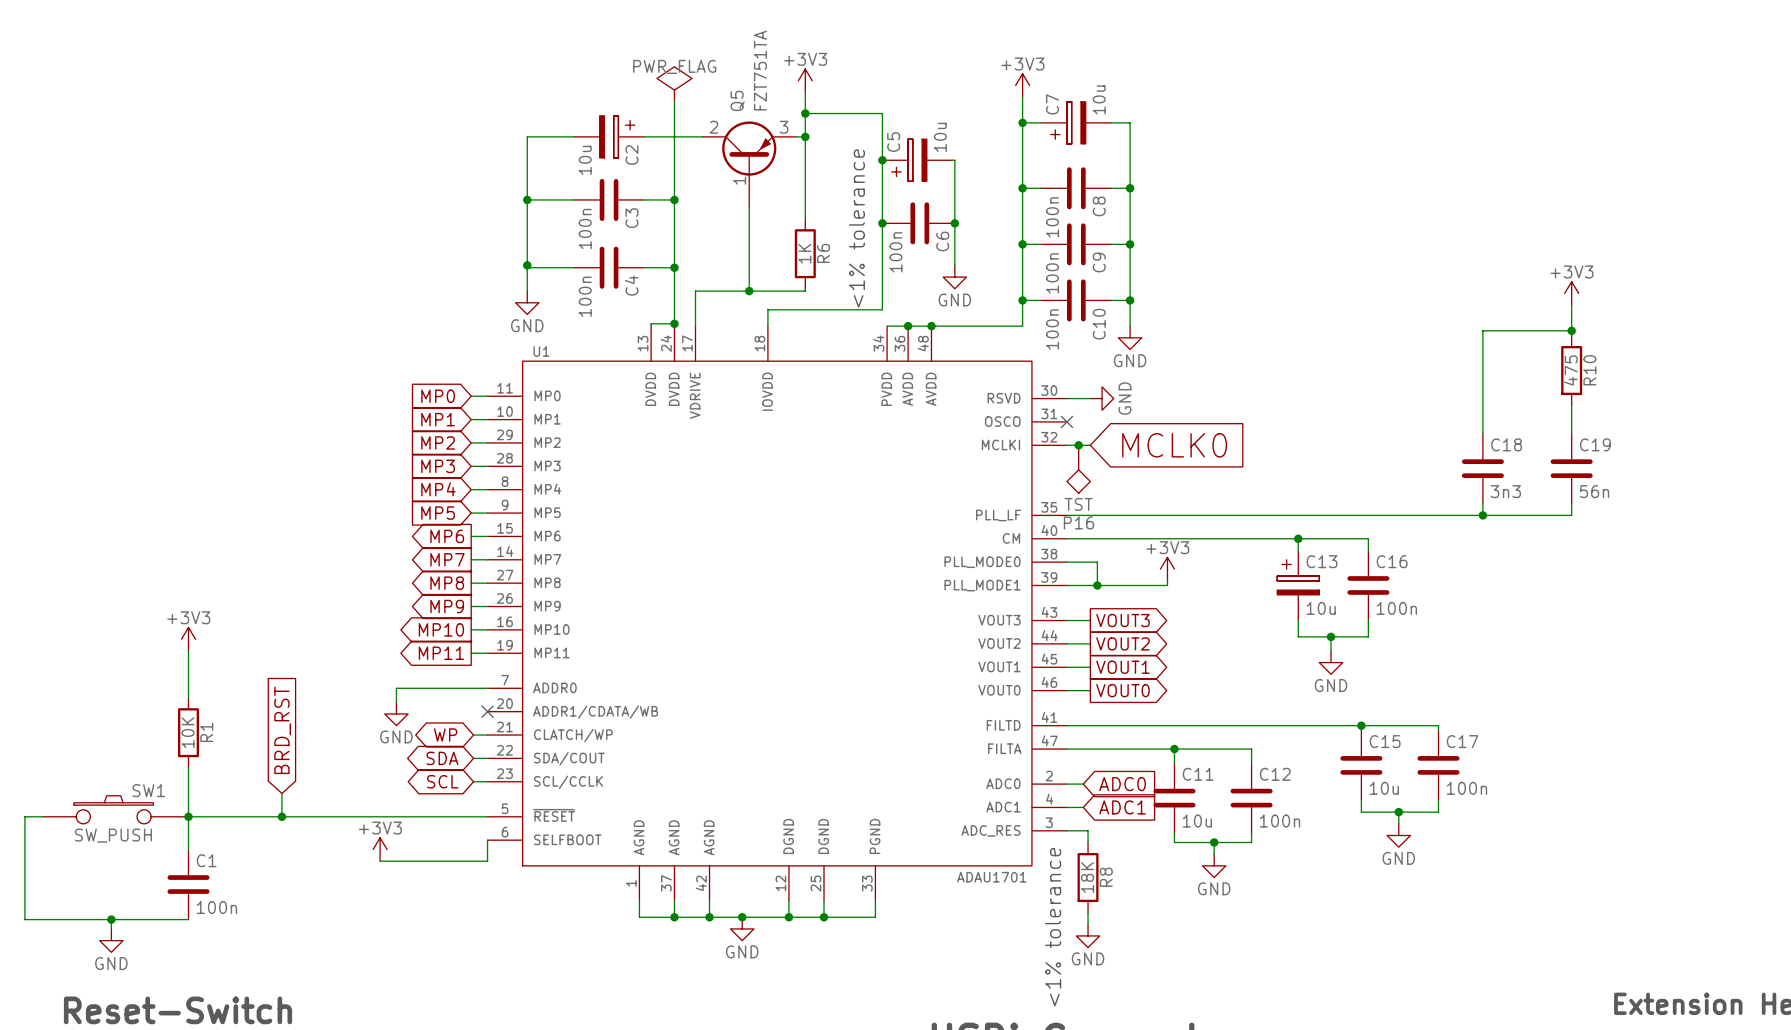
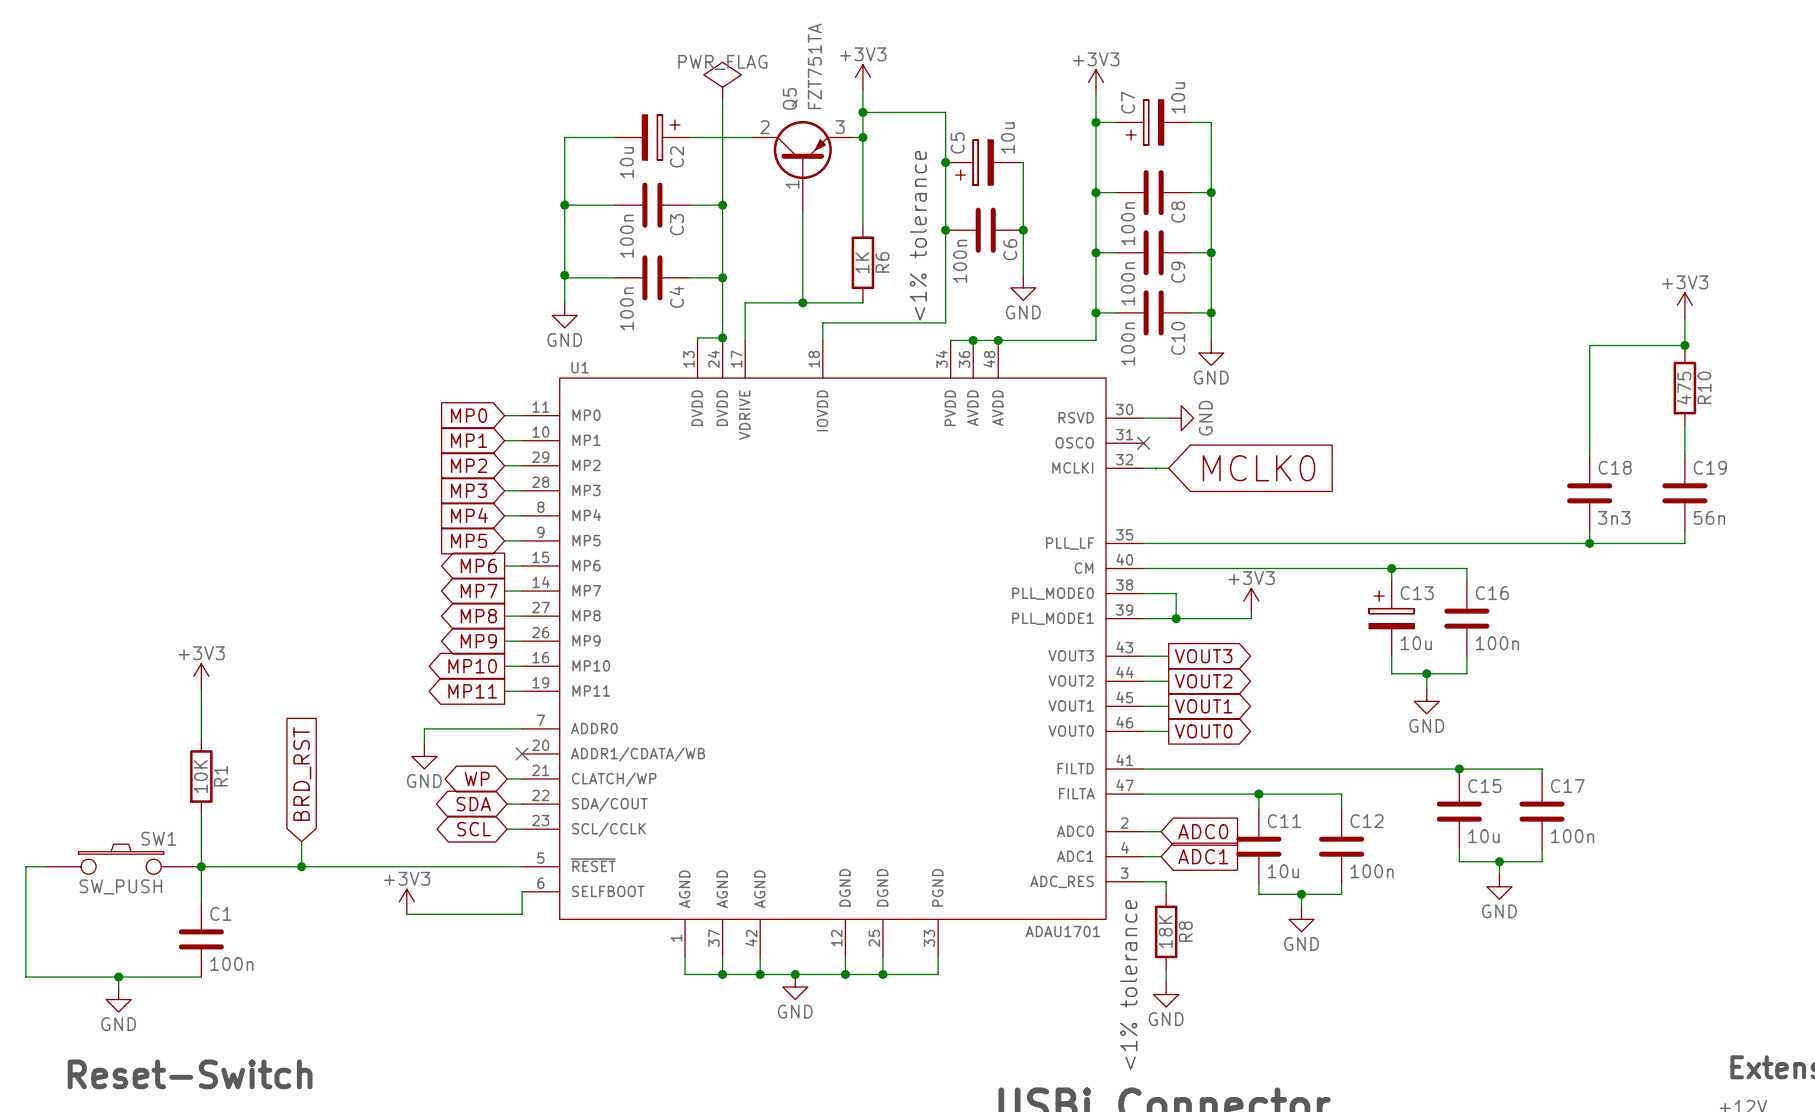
junction: (1078, 445) -> none
P16: TST (1078, 469) -> none

